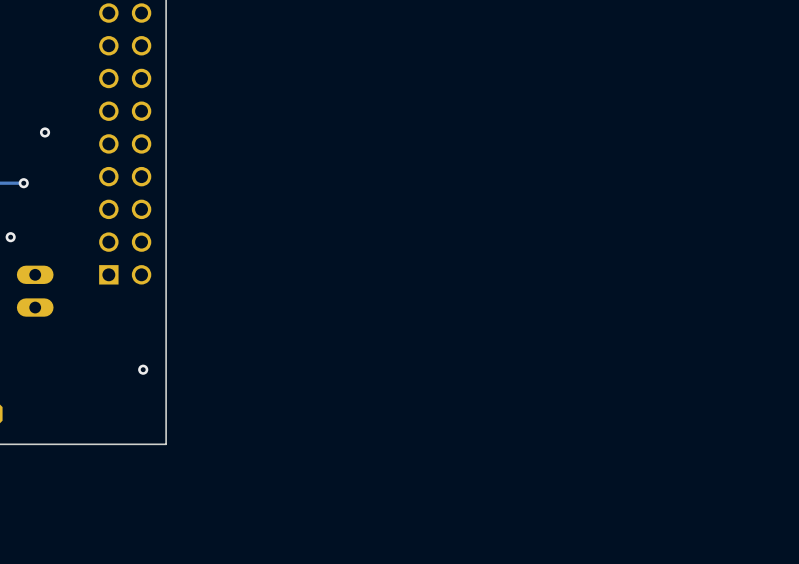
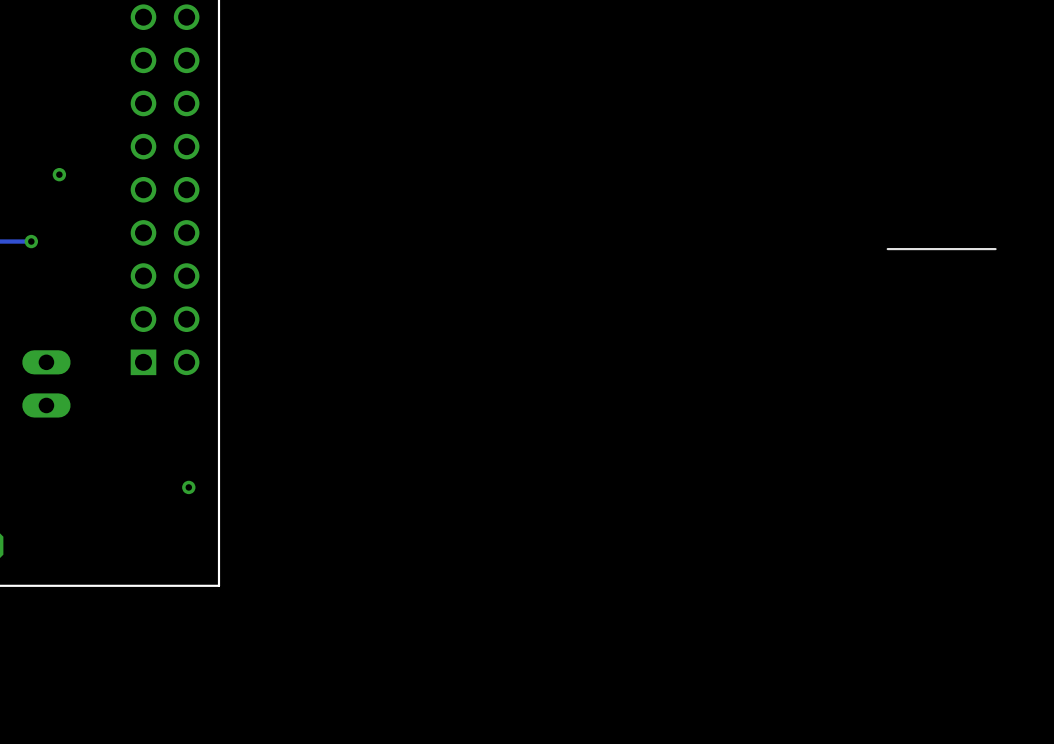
part: none -> (941, 249)
via: (10, 237) -> none

